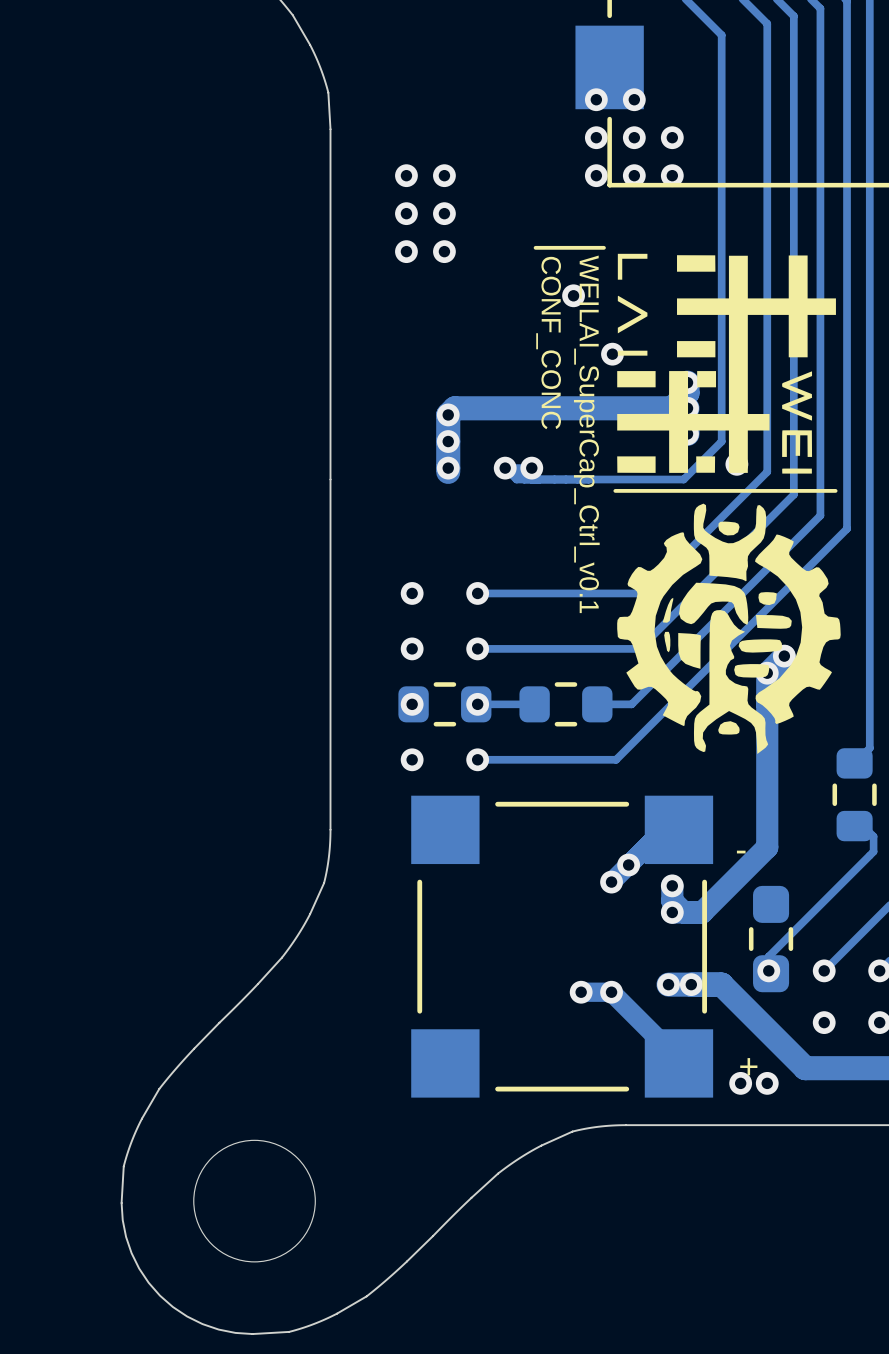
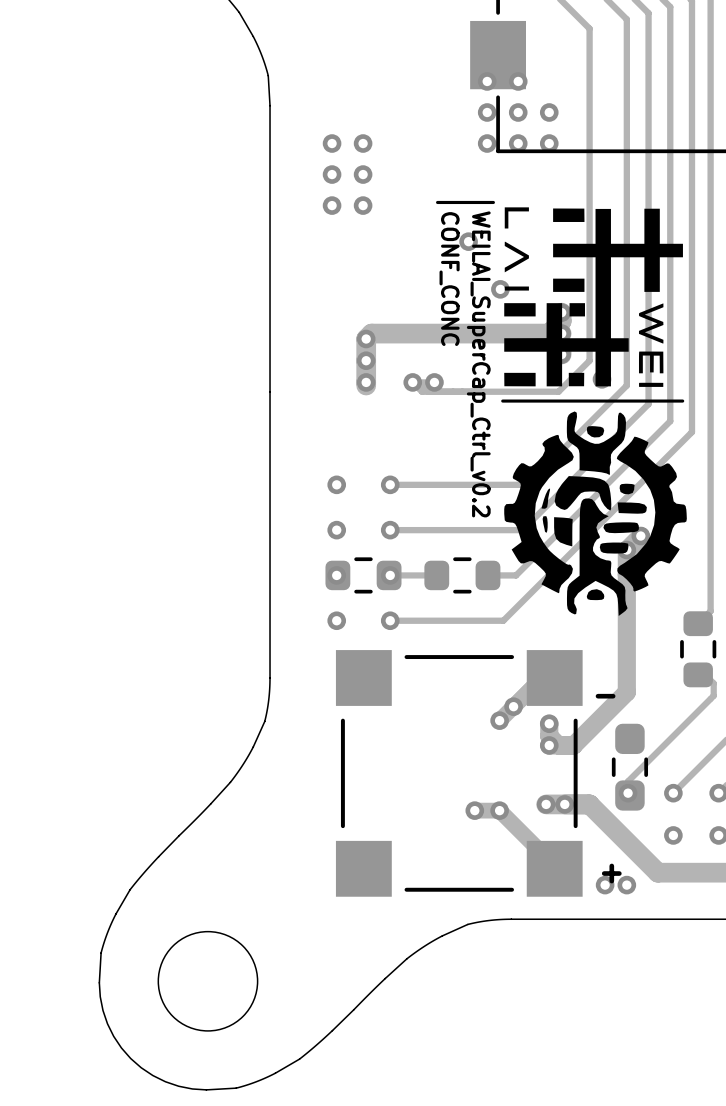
text: WEILAI_SuperCap_Ctrl_v0.1 (586, 434) -> WEILAI_SuperCap_Ctrl_v0.2 (478, 364)

